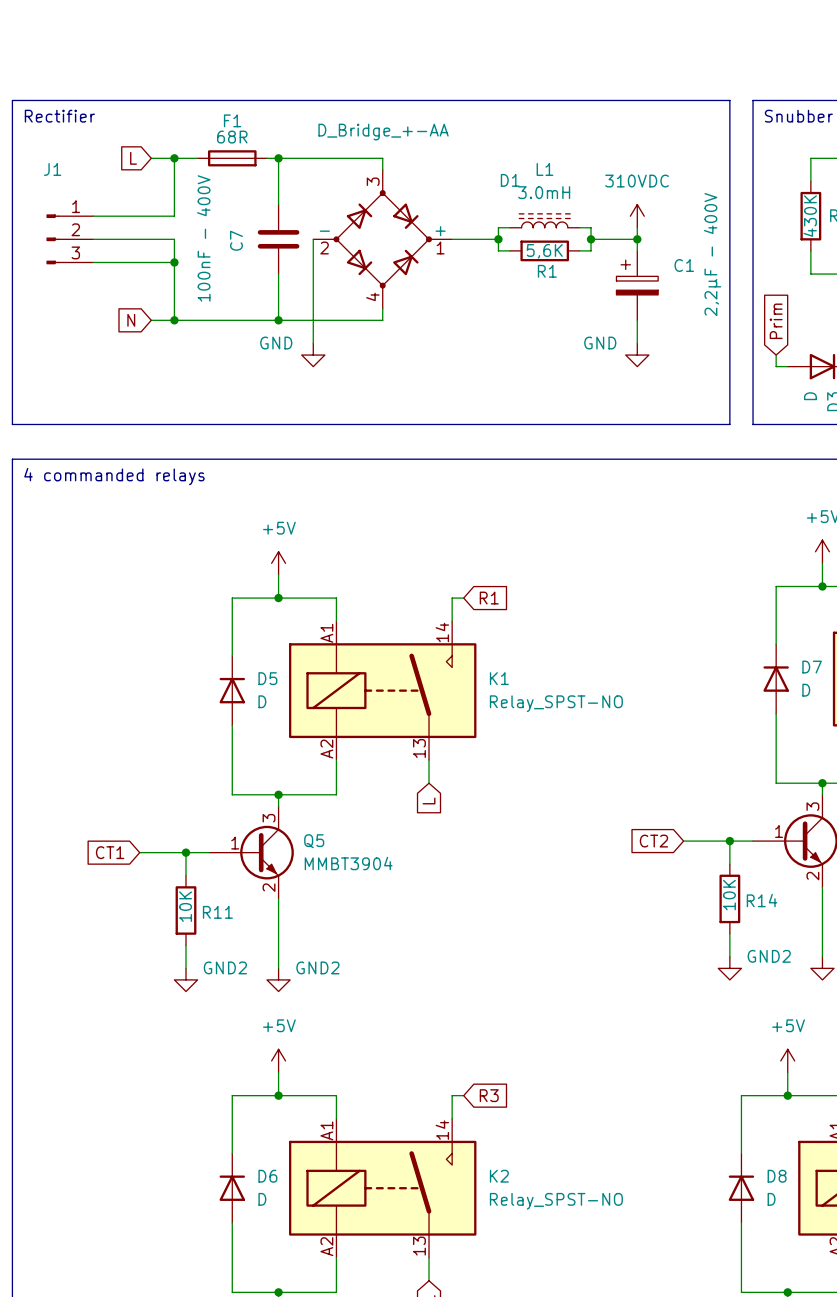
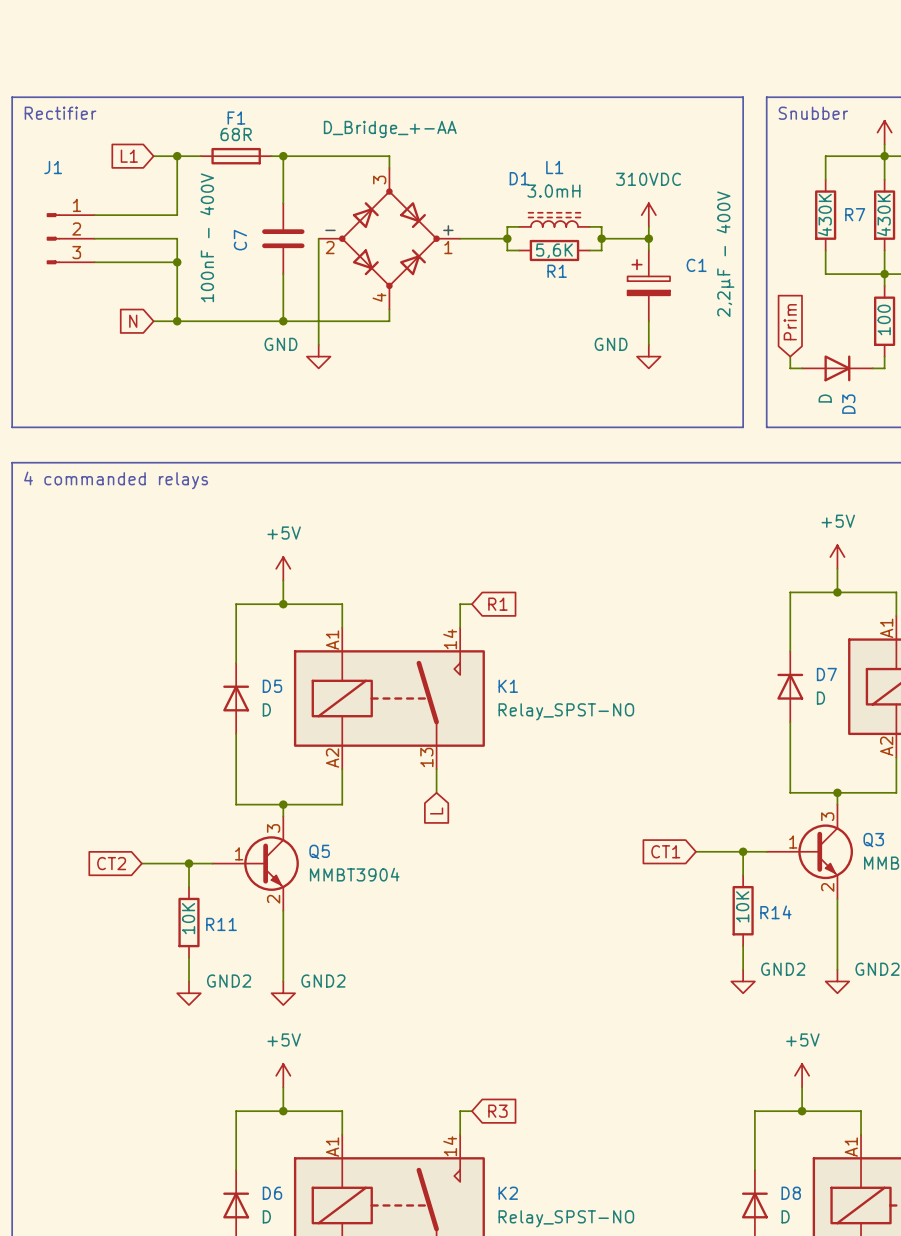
global label: L (133, 158) -> L1 (129, 156)
global label: CT2 (653, 841) -> CT1 (665, 851)
global label: CT1 (110, 852) -> CT2 (111, 863)

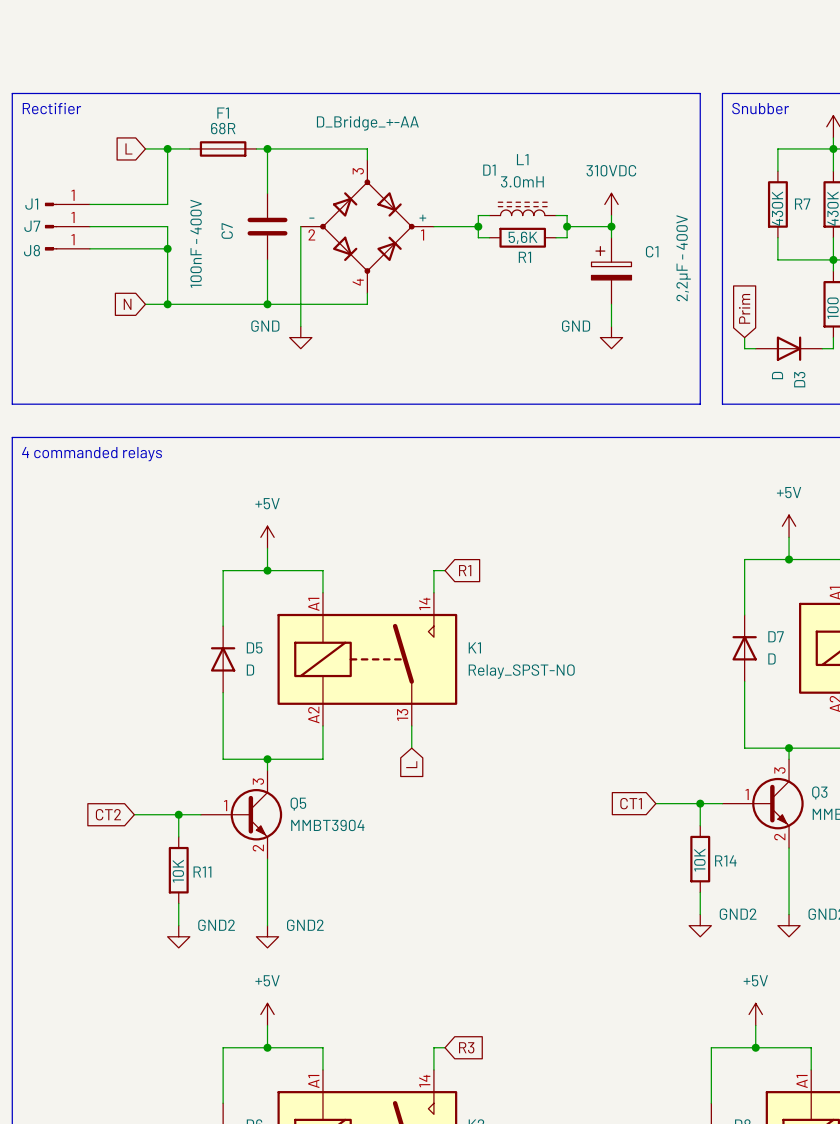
global label: L1 (129, 156) -> L (128, 148)
J1 name position: J1 (53, 167) -> J1 (31, 204)
J1 symbol: [46, 213, 95, 265] -> [44, 202, 90, 207]
J7: none -> (67, 226)
J8: none -> (67, 248)

